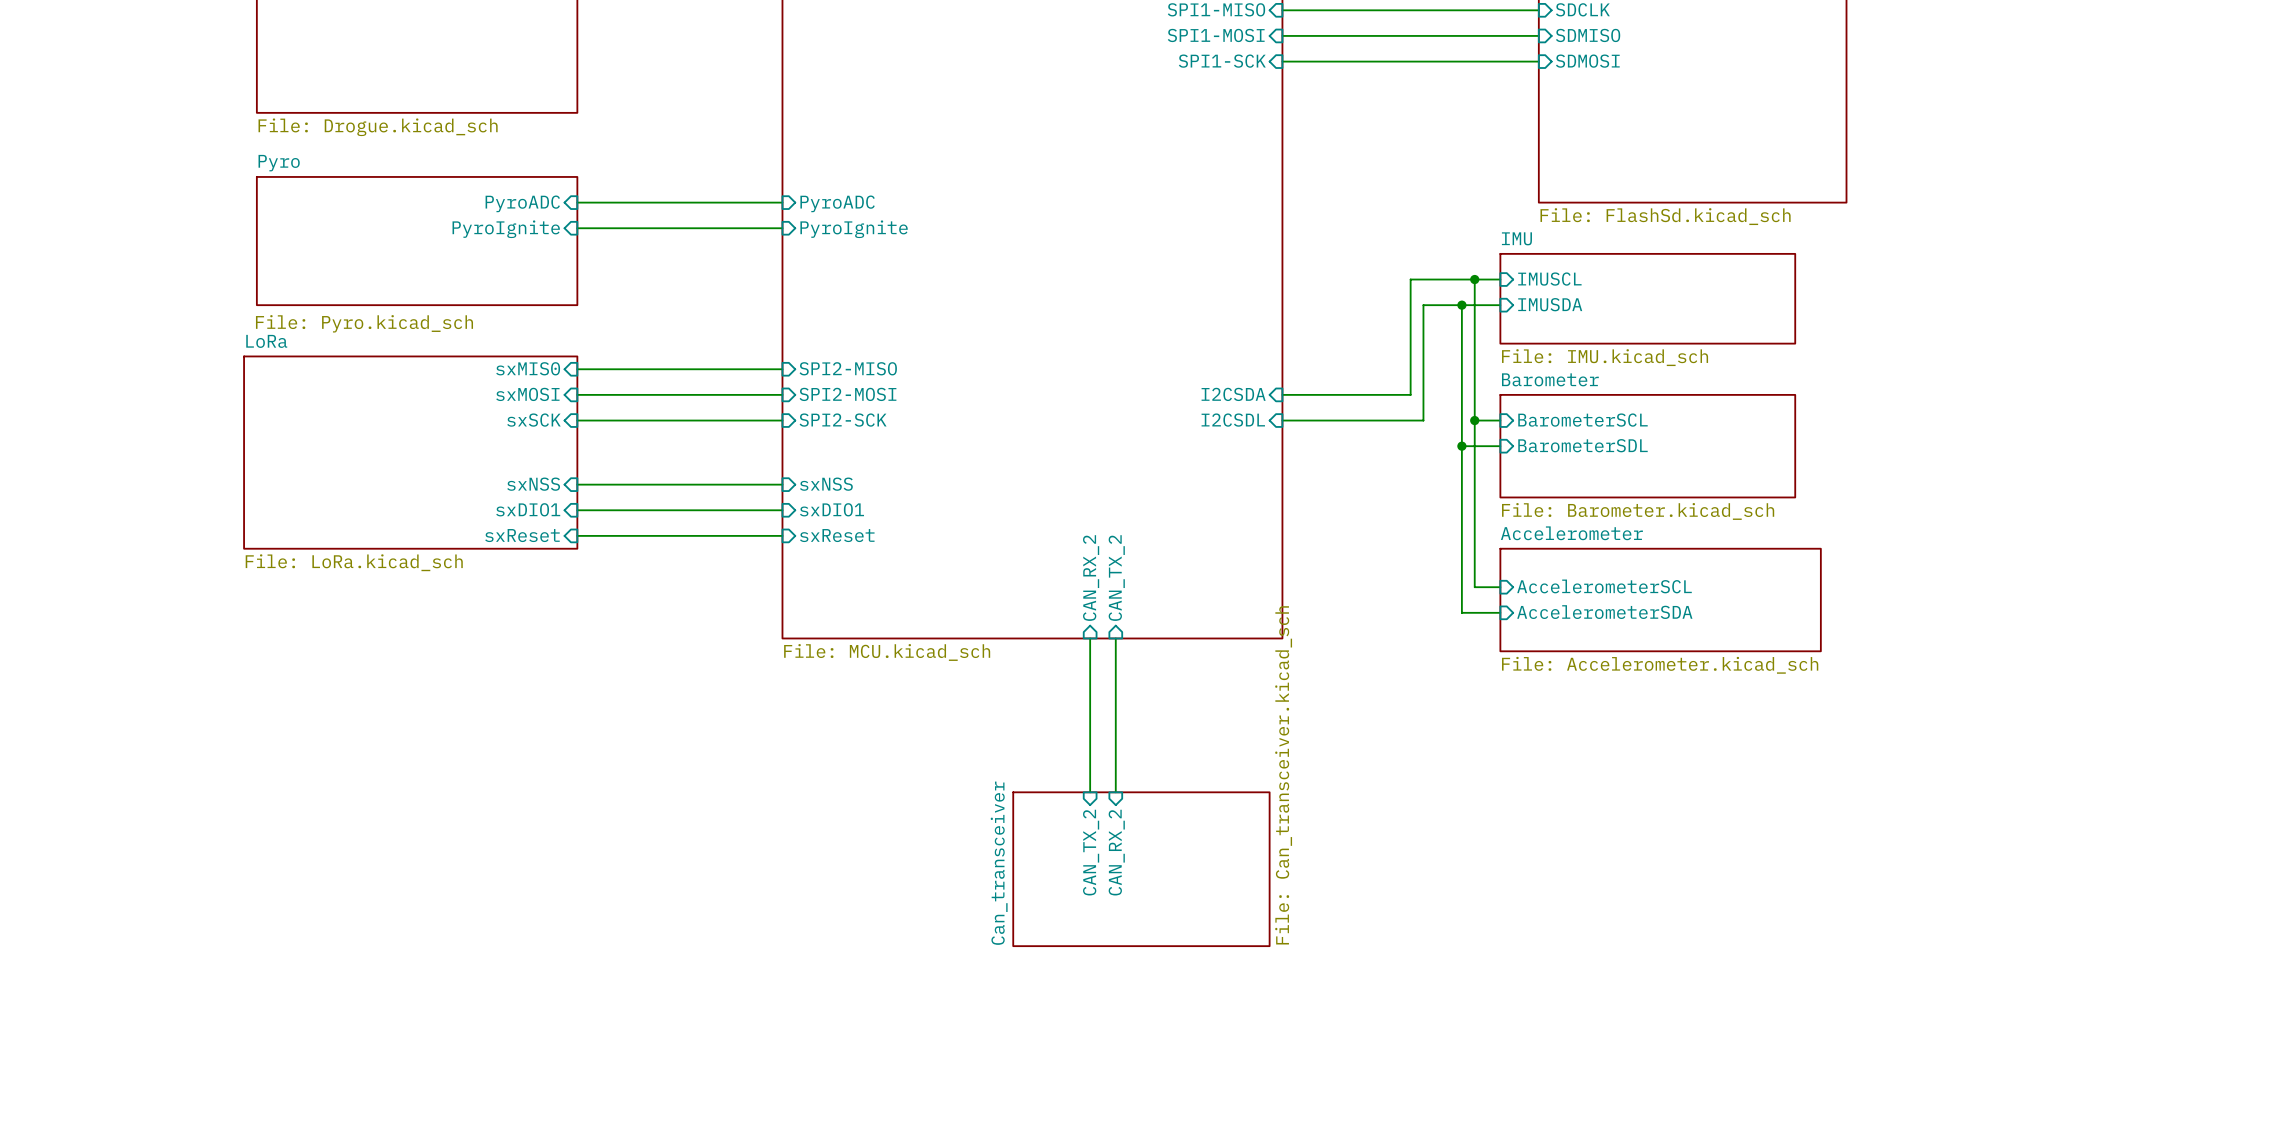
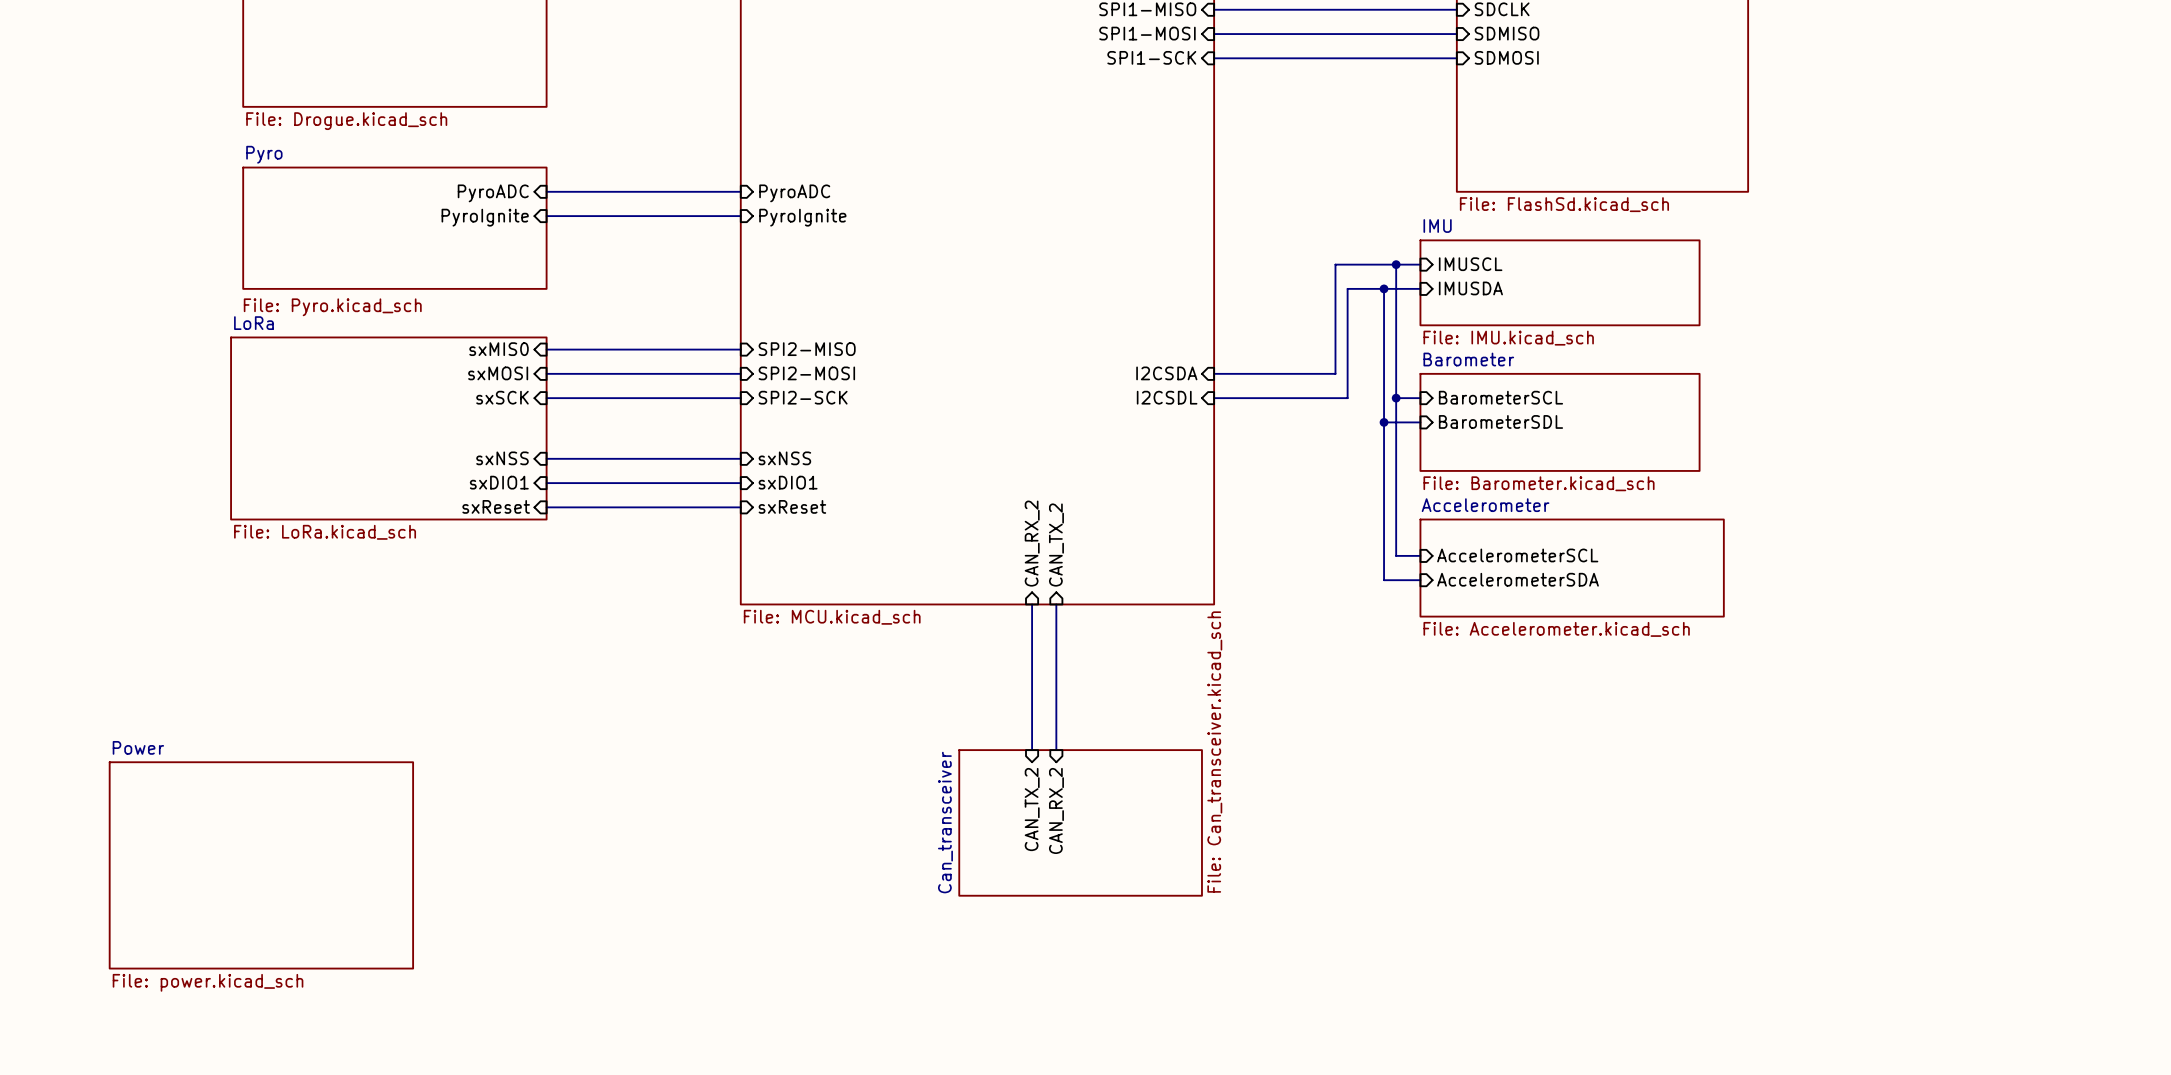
sheet Power: none -> File: power.kicad_sch (261, 865)

